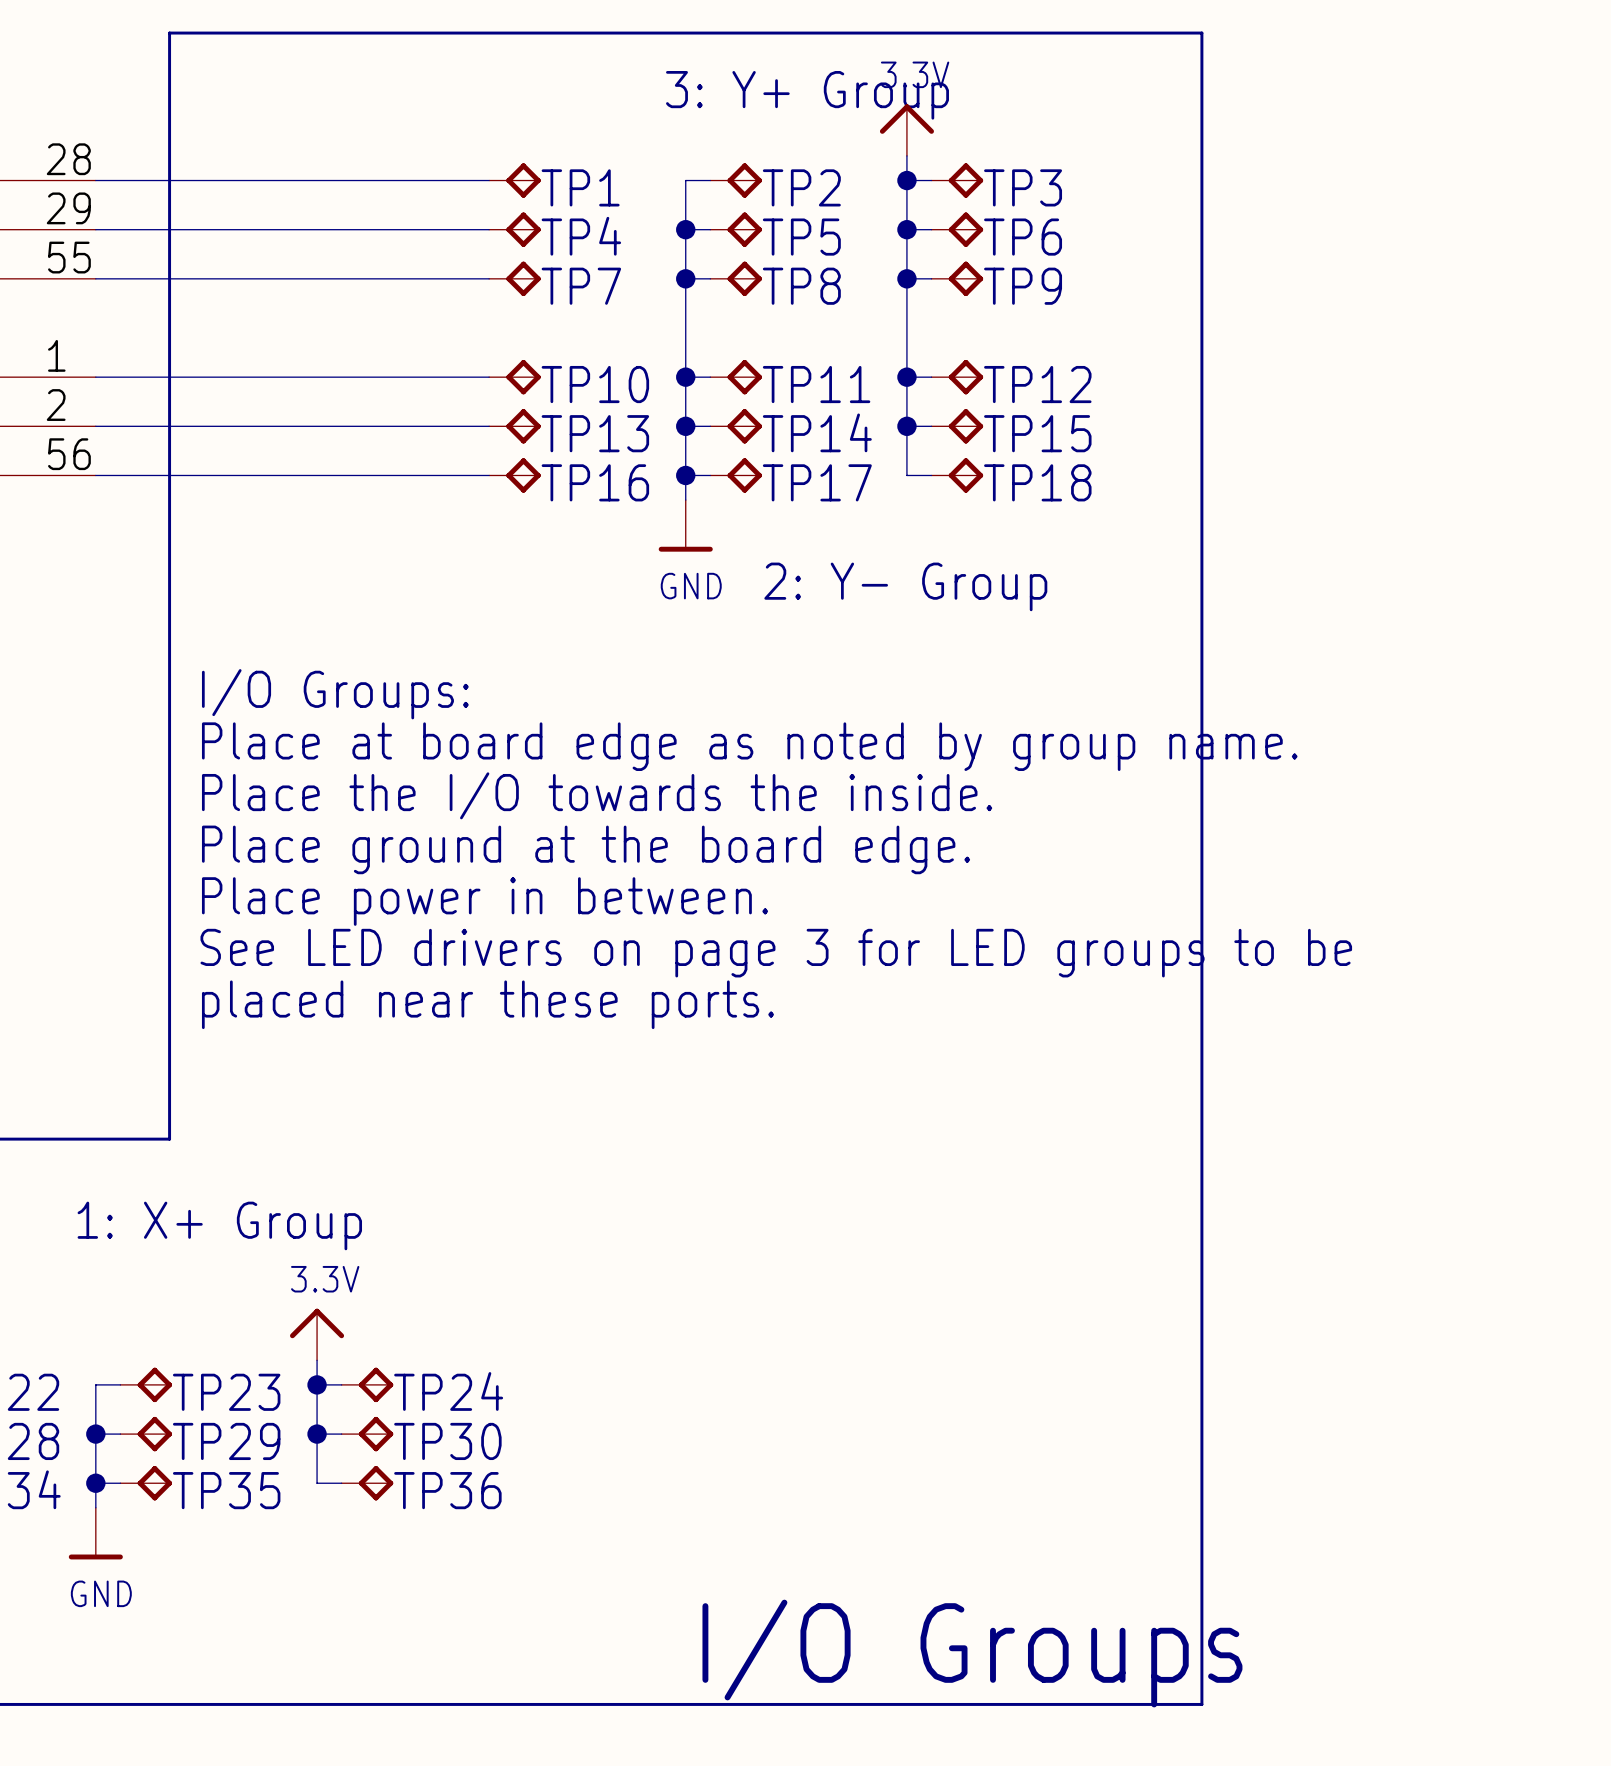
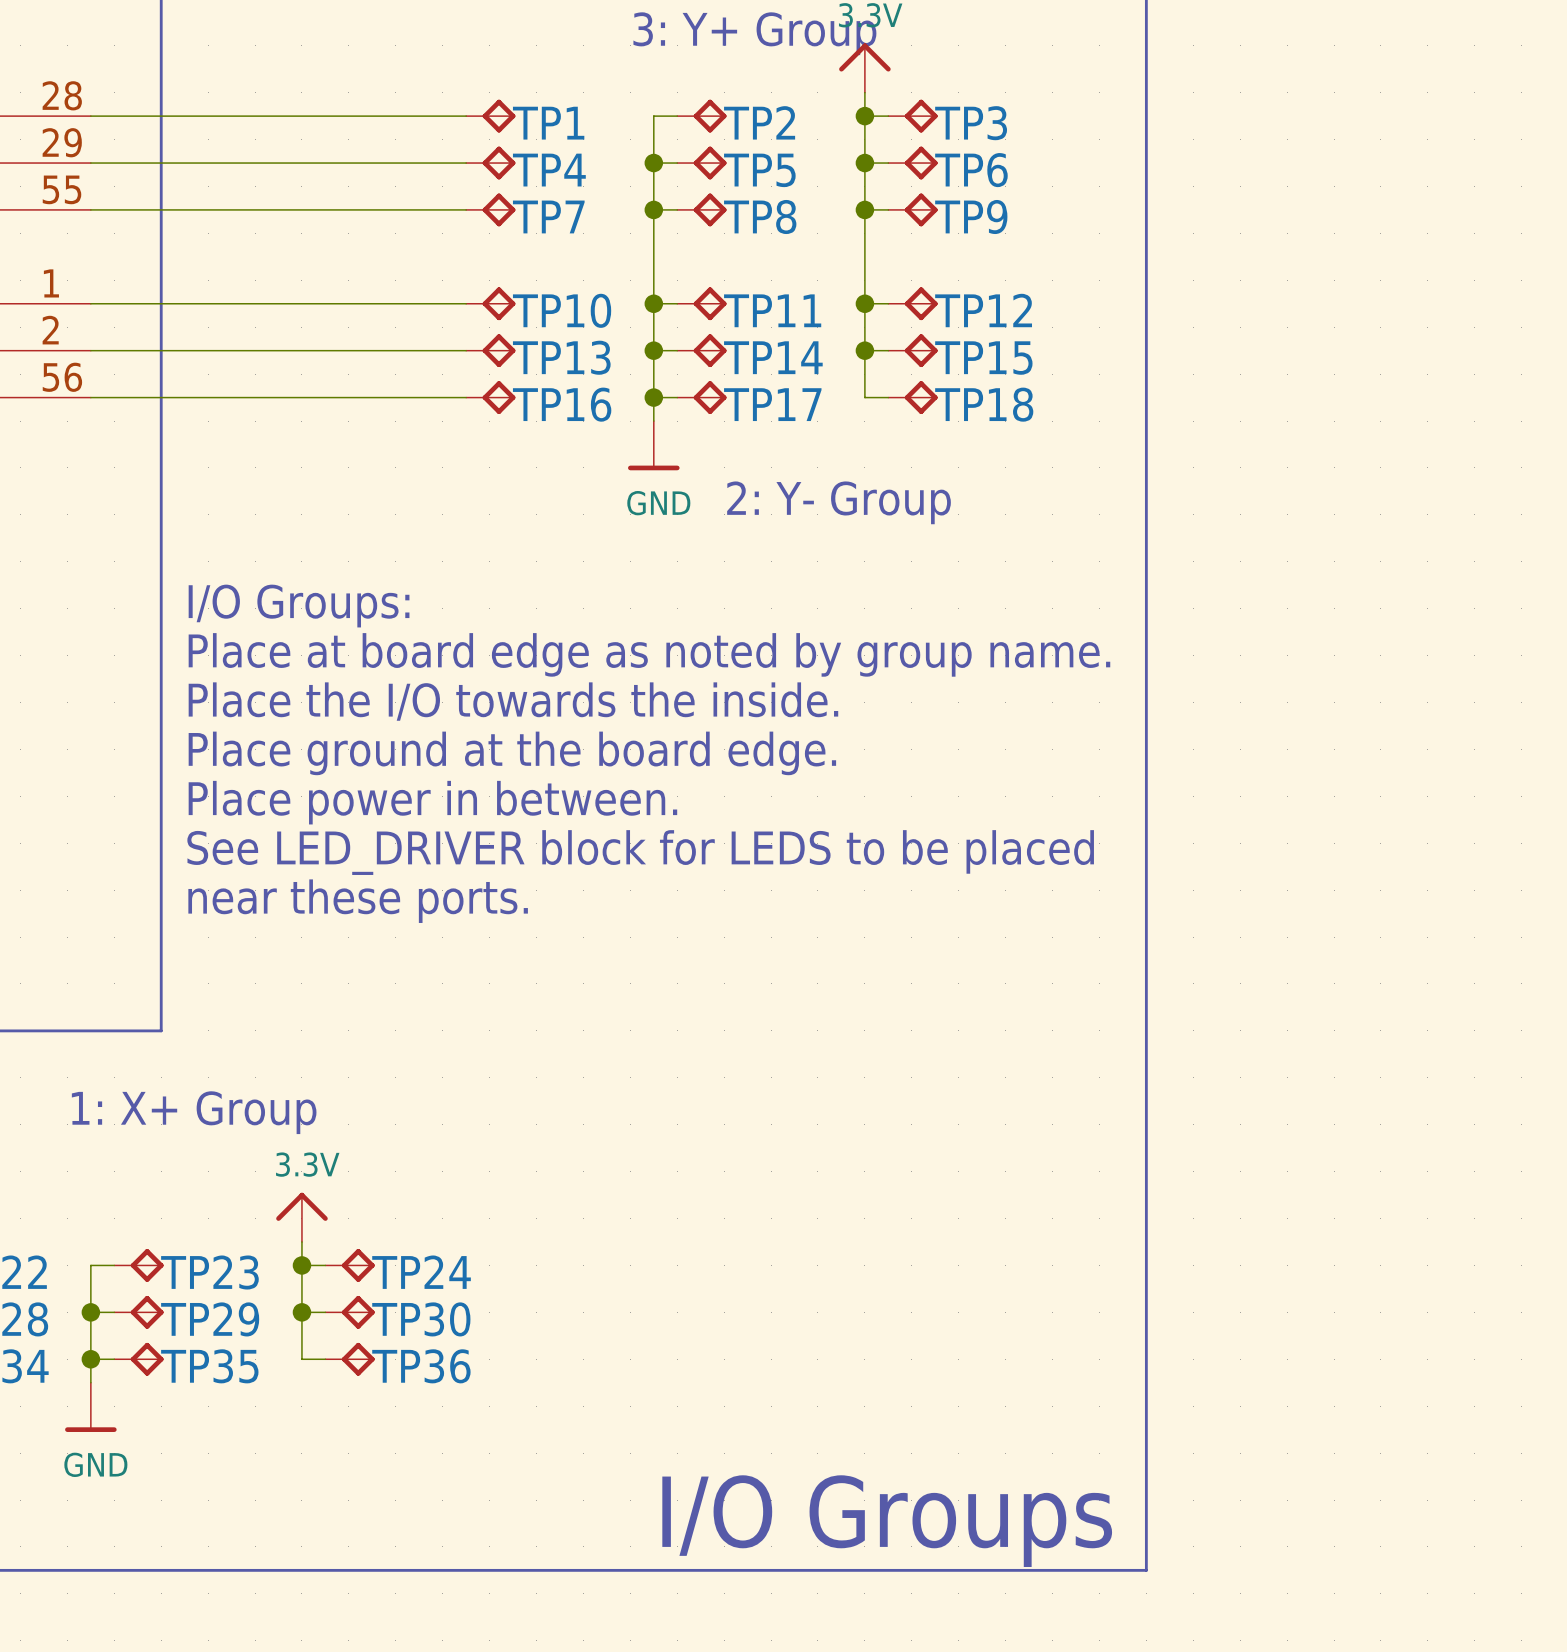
text: See LED drivers on page 3 for LED groups to be (776, 953) -> See LED_DRIVER block for LEDS to be placed (640, 852)
text: placed near these ports. (487, 1004) -> near these ports. (358, 901)

